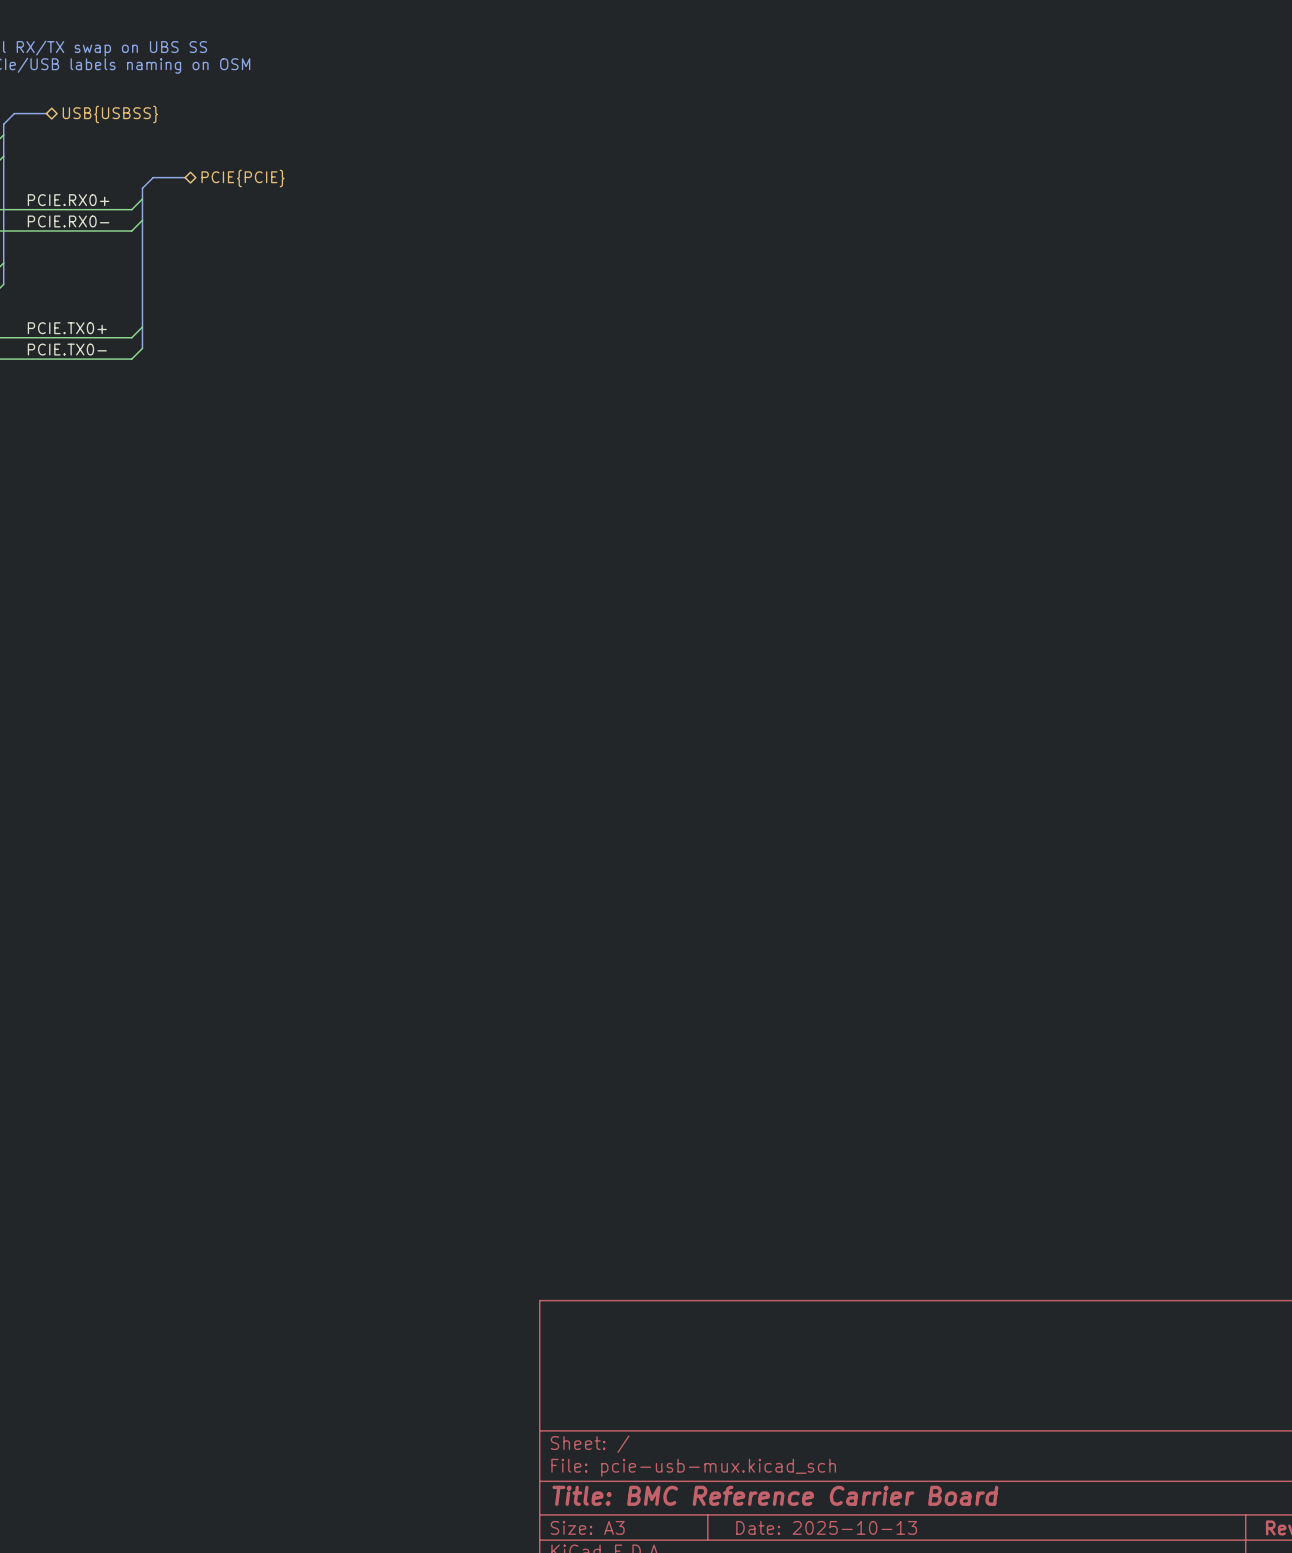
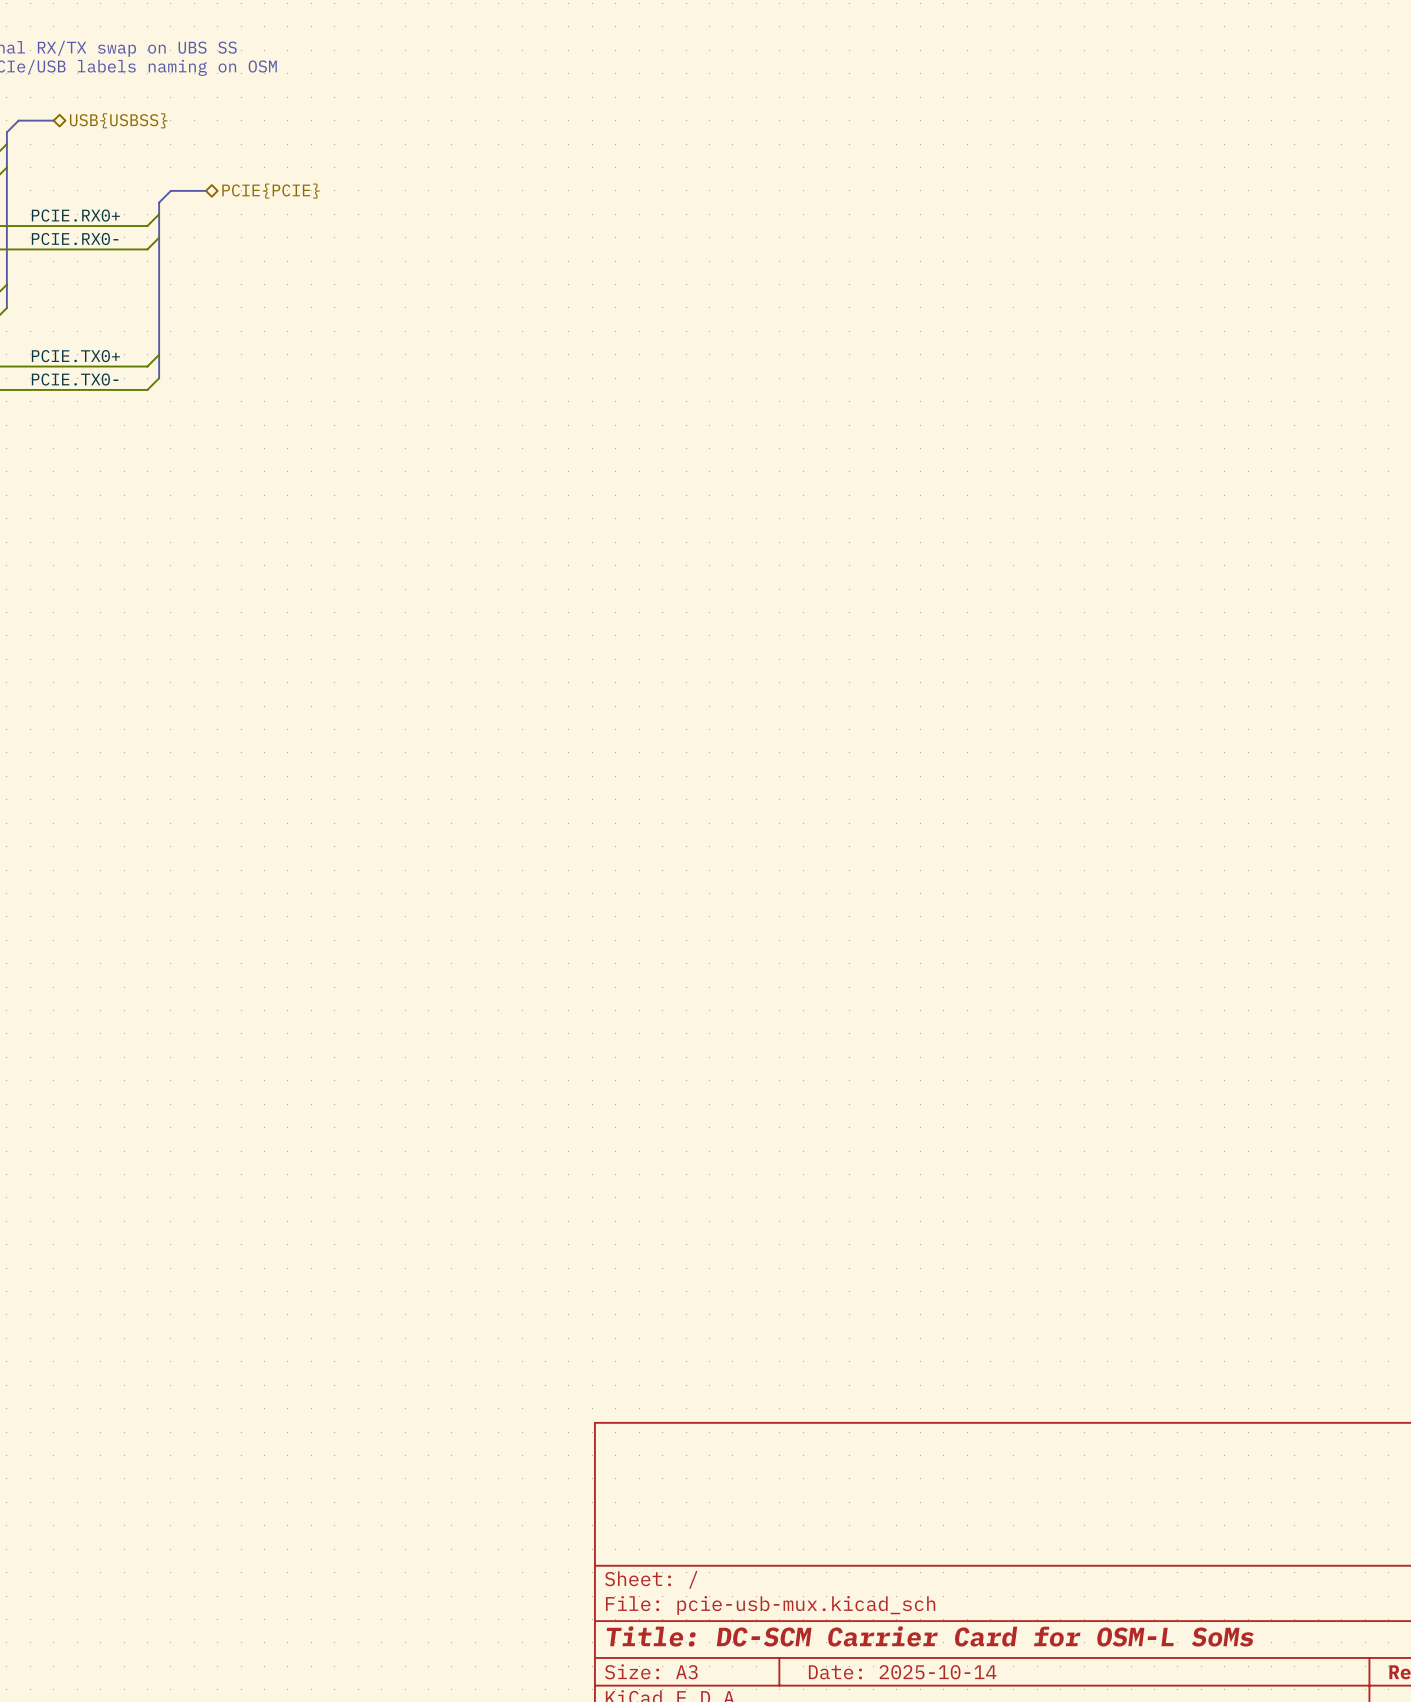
title block: Title: BMC Reference Carrier Board (775, 1495) -> Title: DC-SCM Carrier Card for OSM-L SoMs (930, 1636)
title block: Date: 2025-10-13 (826, 1527) -> Date: 2025-10-14 (902, 1672)

